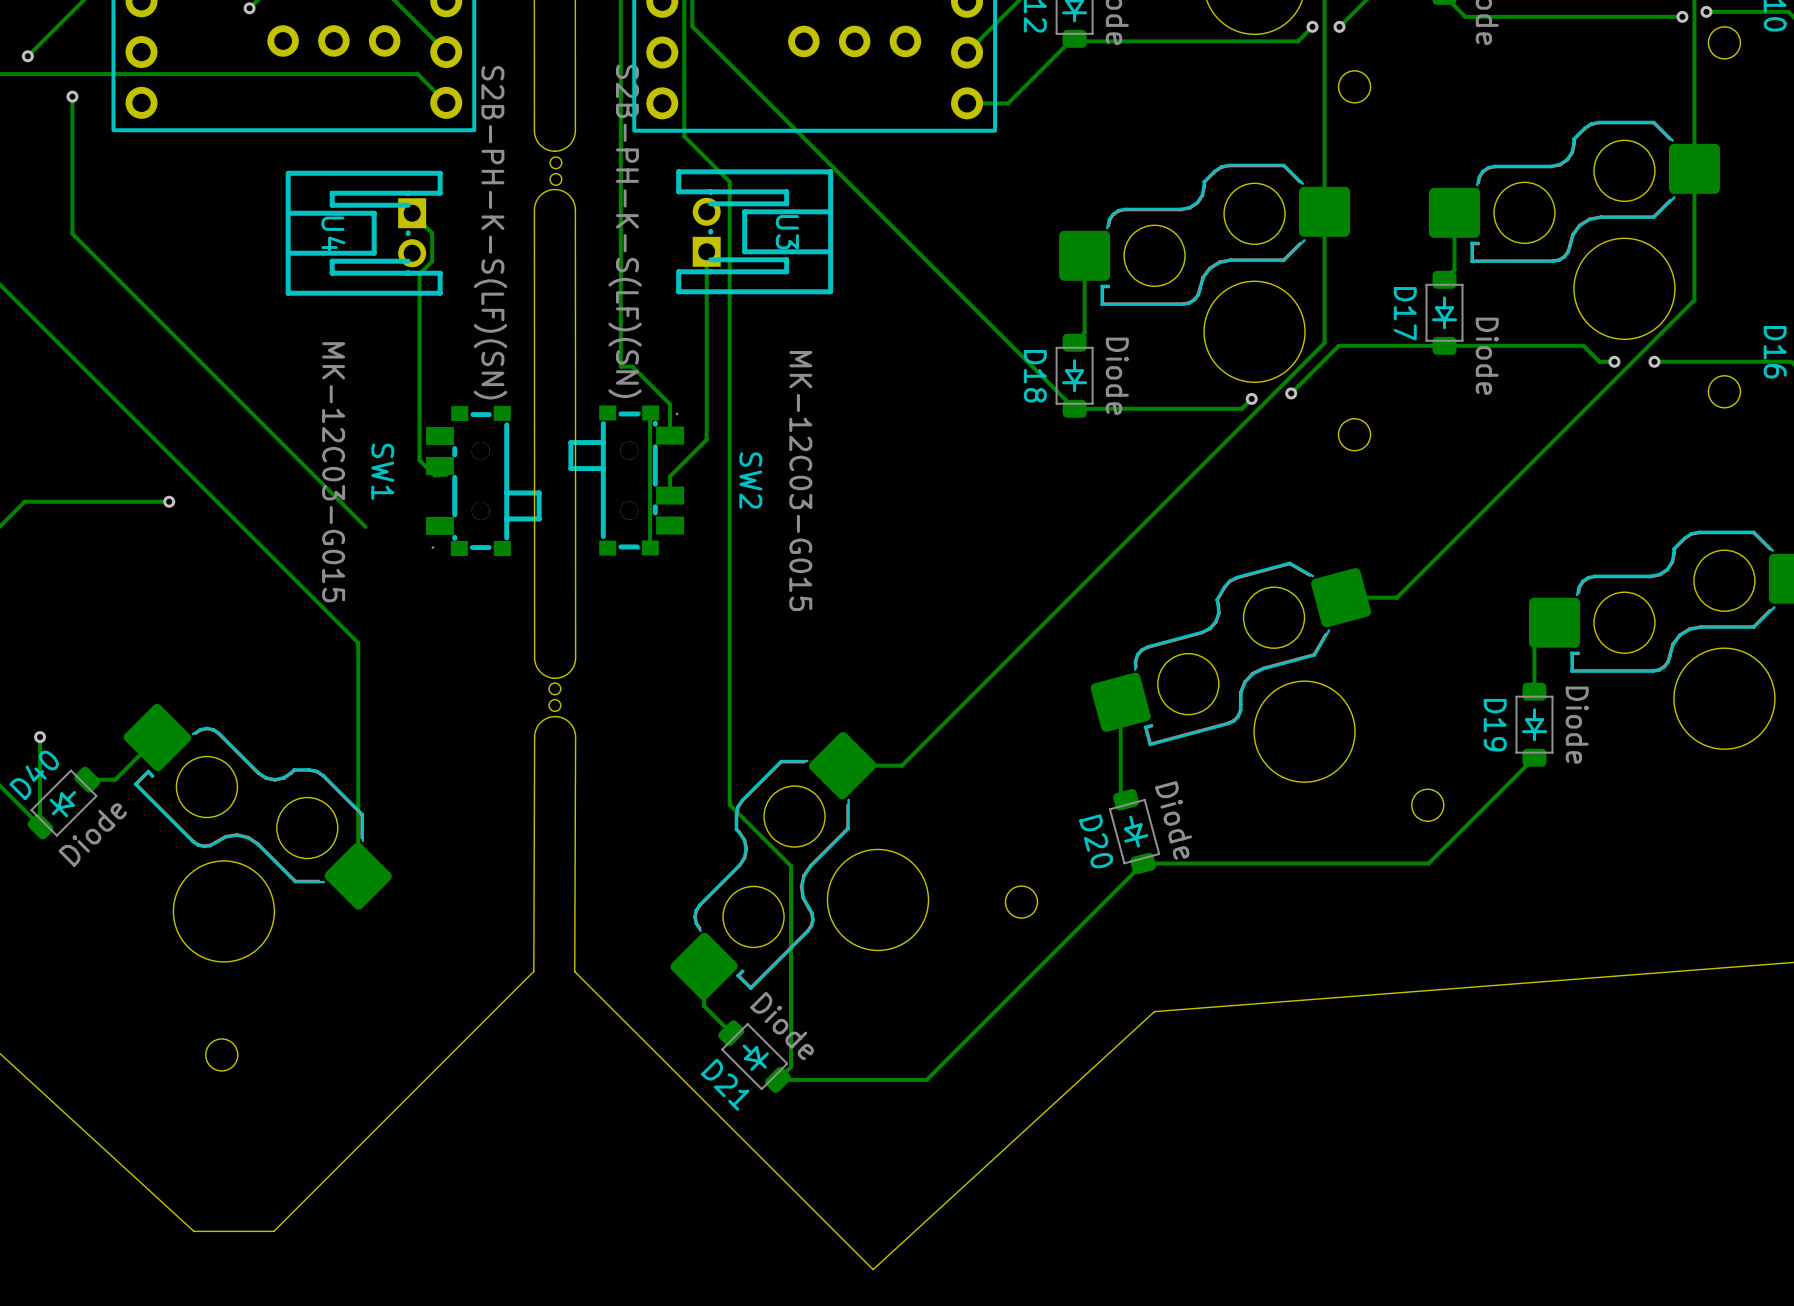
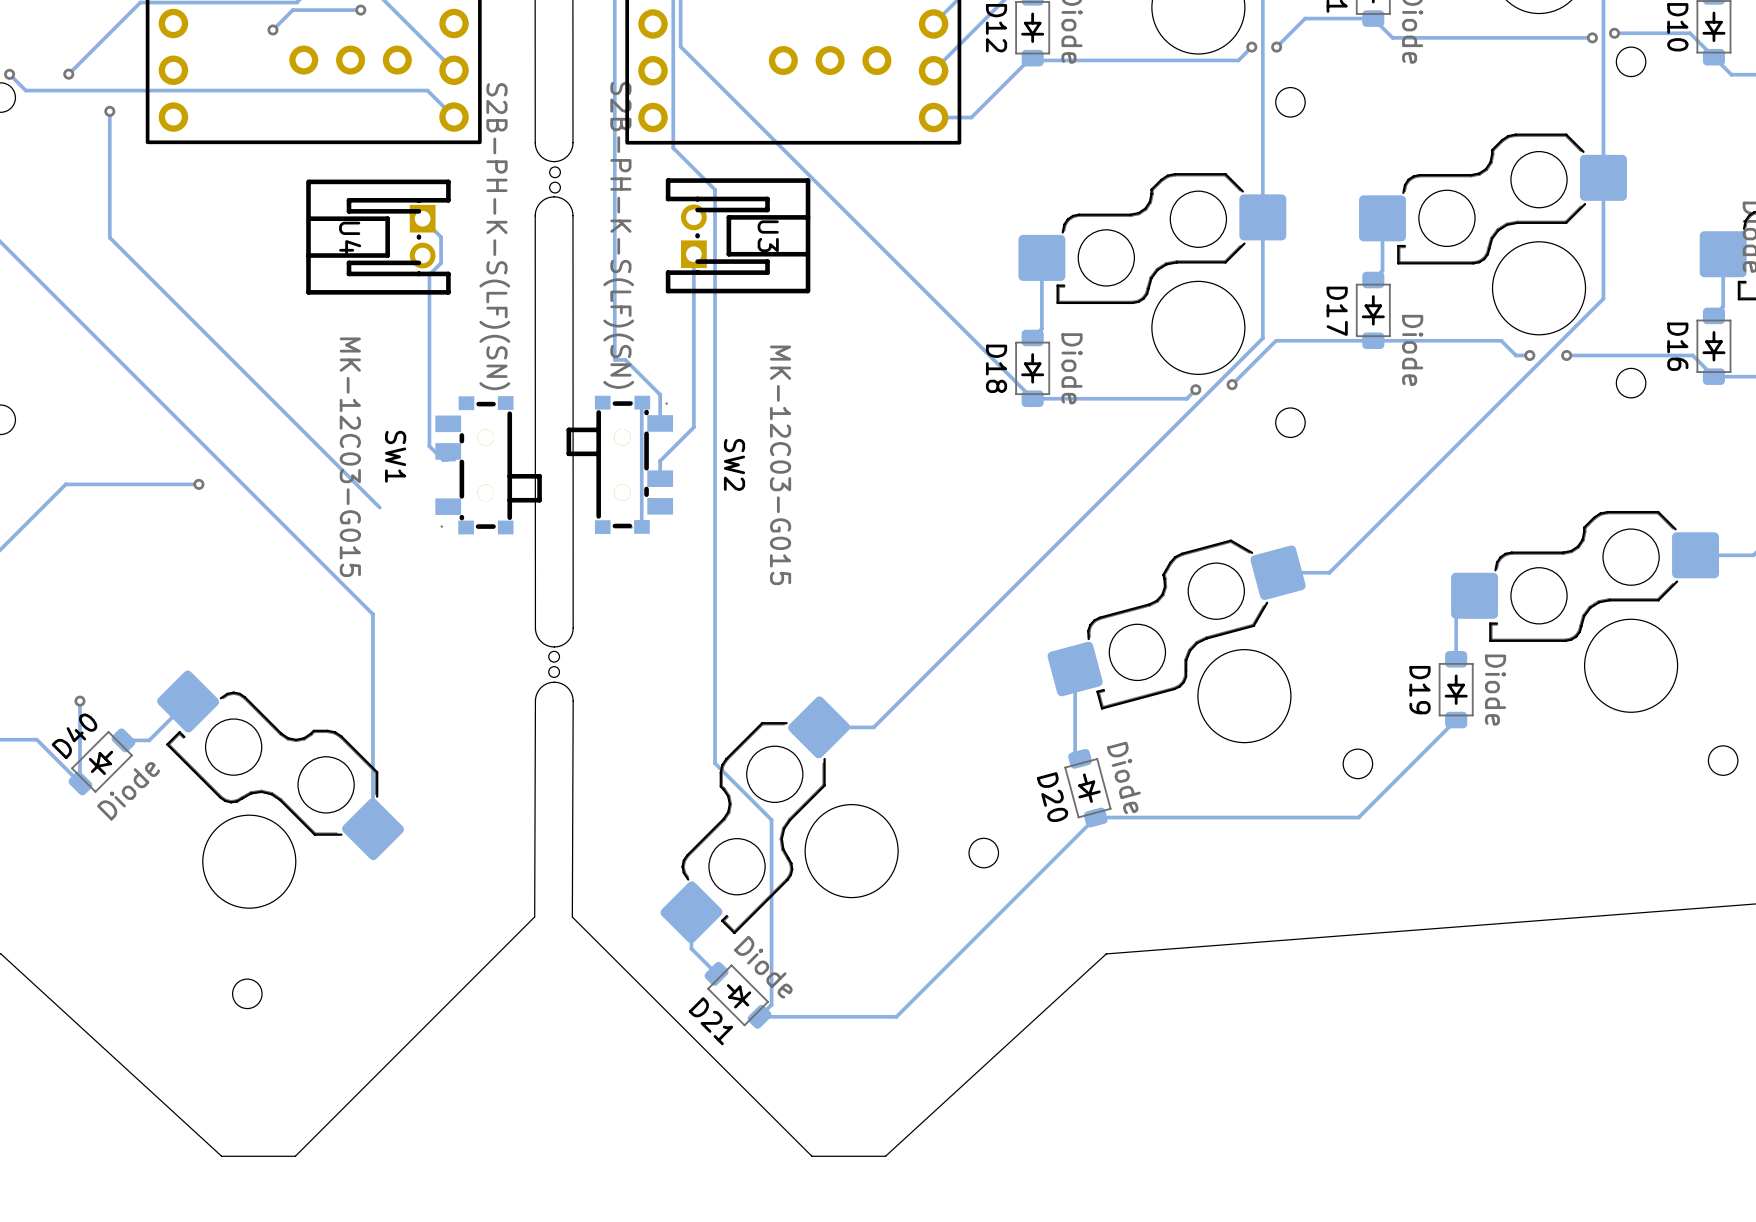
board edge: (914, 1231) (873, 1269) (834, 1231) -> (885, 1156) (811, 1156)

